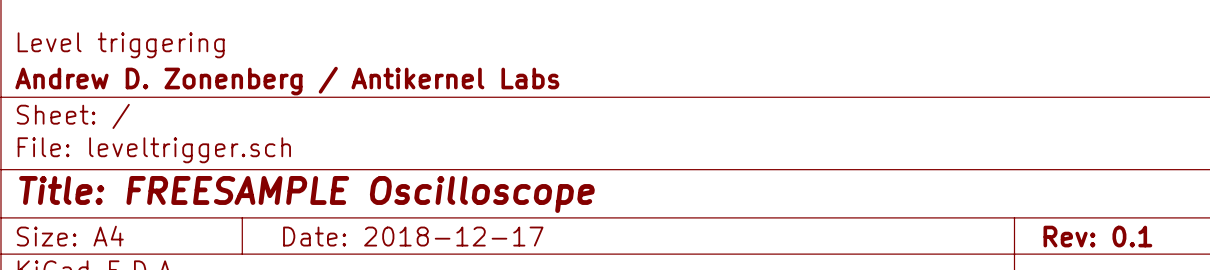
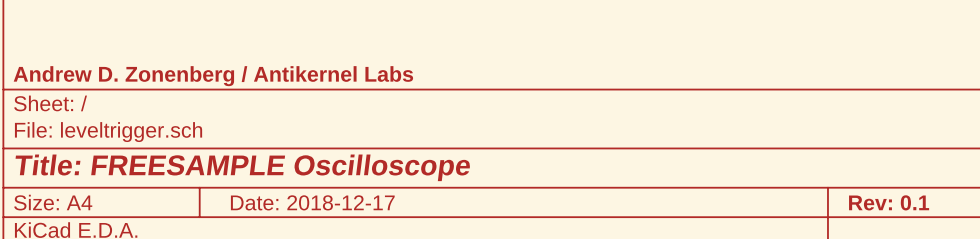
title block: Level triggering (121, 45) -> none

